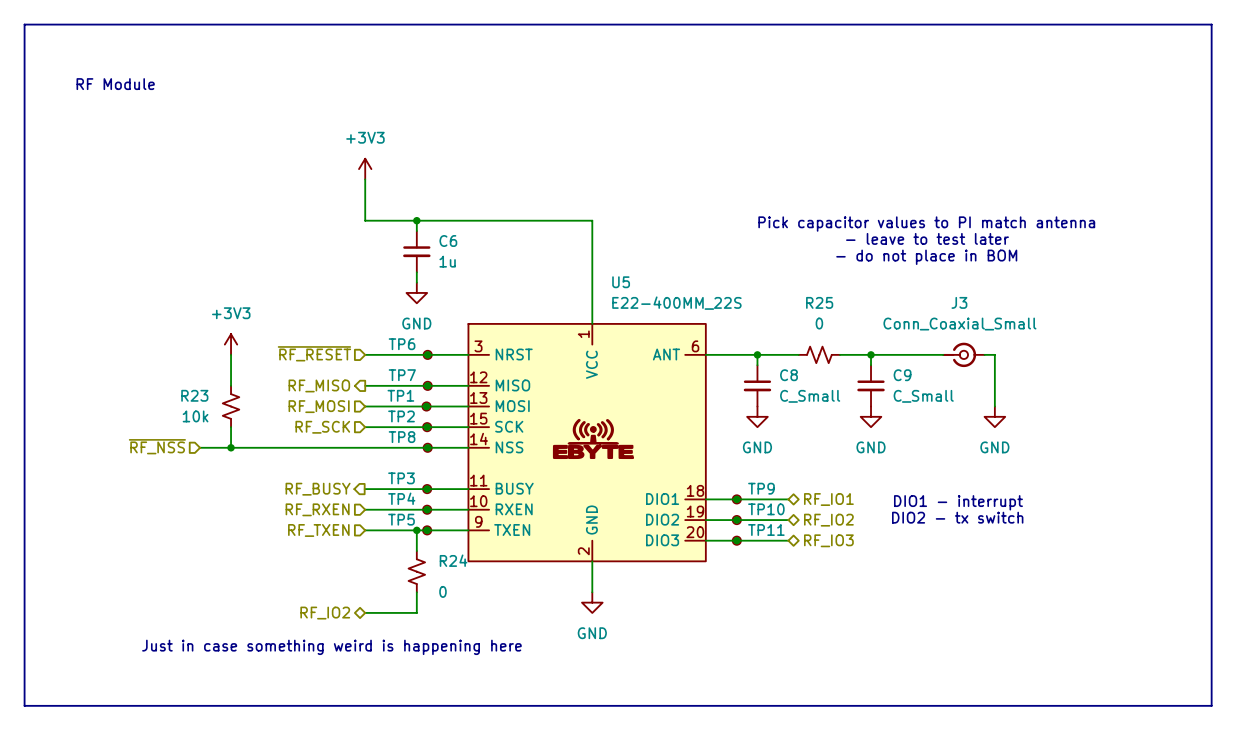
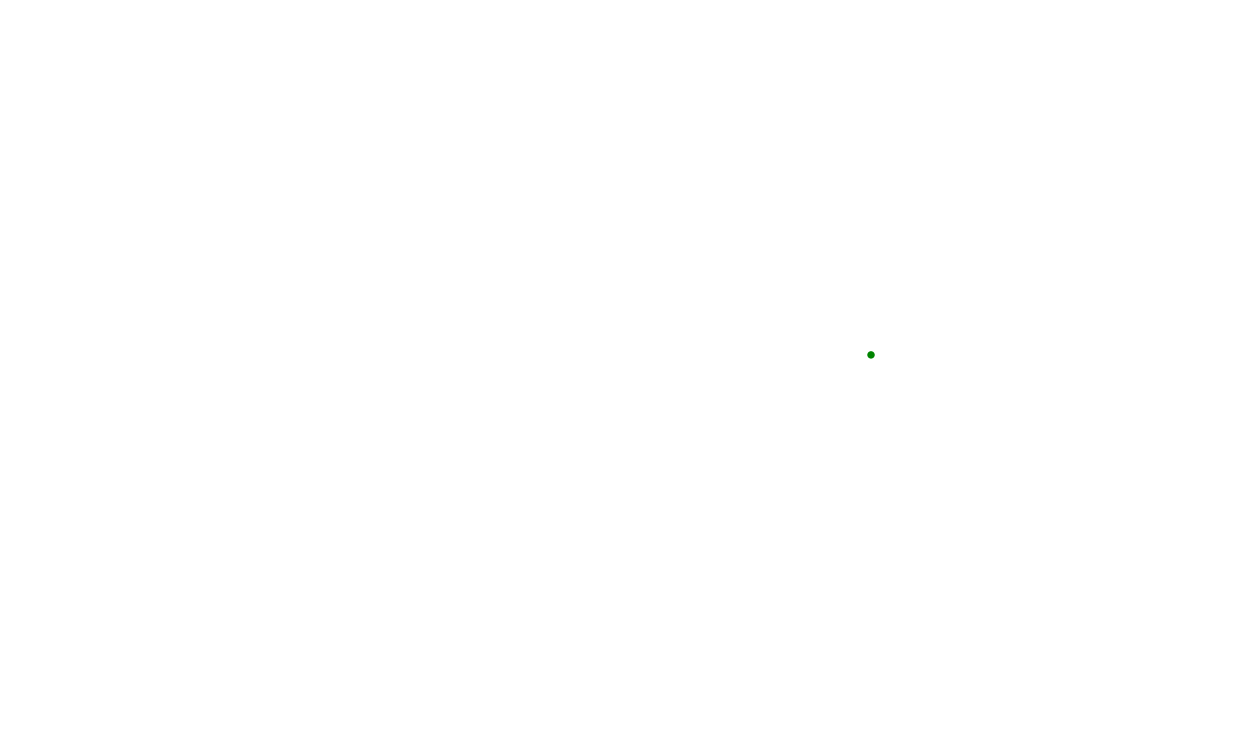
line: (24, 24) (24, 705) (1211, 705) (1211, 24) (24, 24) -> none
text: RF Module (115, 84) -> none
power symbol: +3V3 (365, 169) -> none
wire: (365, 179) (365, 220) (592, 220) (592, 323) -> none
wire: (416, 220) (416, 231) -> none
junction: (416, 220) -> none
text: Pick capacitor values to PI match antenna (926, 224) -> none
text: - leave to test later (927, 238) -> none
C6: 1u (416, 251) -> none
text: - do not place in BOM (926, 257) -> none
wire: (416, 272) (416, 282) -> none
power symbol: GND (416, 292) -> none
power symbol: +3V3 (231, 344) -> none
hierarchical label: ~{RF_RESET} (314, 353) -> none
wire: (231, 354) (231, 385) -> none
wire: (365, 354) (468, 354) -> none
junction: (427, 354) -> none
TP6: (427, 354) -> none
wire: (705, 354) (798, 354) -> none
wire: (757, 354) (757, 365) -> none
junction: (757, 354) -> none
R25: 0 (819, 354) -> none
wire: (840, 354) (943, 354) -> none
wire: (871, 354) (871, 365) -> none
J3: Conn_Coaxial_Small (963, 354) -> none
wire: (984, 354) (994, 354) (994, 406) -> none
hierarchical label: RF_MISO (319, 385) -> none
wire: (365, 385) (468, 385) -> none
junction: (427, 385) -> none
TP7: (427, 385) -> none
C8: C_Small (757, 385) -> none
C9: C_Small (871, 385) -> none
R23: 10k (231, 406) -> none
hierarchical label: RF_MOSI (319, 406) -> none
wire: (365, 406) (468, 406) -> none
junction: (426, 406) -> none
TP1: (426, 406) -> none
power symbol: GND (757, 416) -> none
power symbol: GND (871, 416) -> none
power symbol: GND (994, 416) -> none
wire: (231, 427) (231, 447) -> none
hierarchical label: RF_SCK (322, 427) -> none
wire: (365, 427) (468, 427) -> none
junction: (427, 427) -> none
TP2: (427, 427) -> none
U5: E22-400MM_22S (587, 442) -> none
hierarchical label: ~{RF_NSS} (157, 446) -> none
wire: (200, 447) (468, 447) -> none
junction: (231, 447) -> none
junction: (427, 447) -> none
TP8: (427, 447) -> none
hierarchical label: RF_BUSY (318, 489) -> none
wire: (364, 489) (468, 489) -> none
junction: (427, 489) -> none
TP3: (427, 489) -> none
wire: (705, 499) (788, 499) -> none
junction: (736, 499) -> none
TP9: (736, 499) -> none
hierarchical label: RF_IO1 (828, 499) -> none
text: DIO1 - interrupt (958, 502) -> none
hierarchical label: RF_RXEN (317, 509) -> none
wire: (365, 509) (468, 509) -> none
junction: (427, 509) -> none
TP4: (427, 509) -> none
text: DIO2 - tx switch (957, 517) -> none
wire: (705, 520) (788, 520) -> none
junction: (736, 520) -> none
TP10: (736, 520) -> none
hierarchical label: RF_IO2 (828, 520) -> none
hierarchical label: RF_TXEN (318, 530) -> none
wire: (365, 530) (468, 530) -> none
wire: (416, 530) (416, 551) -> none
junction: (416, 530) -> none
junction: (427, 530) -> none
TP5: (427, 530) -> none
wire: (705, 540) (788, 540) -> none
junction: (736, 540) -> none
TP11: (736, 540) -> none
hierarchical label: RF_IO3 (828, 540) -> none
wire: (592, 561) (592, 592) -> none
R24: 0 (416, 571) -> none
wire: (416, 592) (416, 612) (365, 612) -> none
power symbol: GND (592, 602) -> none
hierarchical label: RF_IO2 (325, 613) -> none
text: Just in case something weird is happening here (331, 647) -> none

